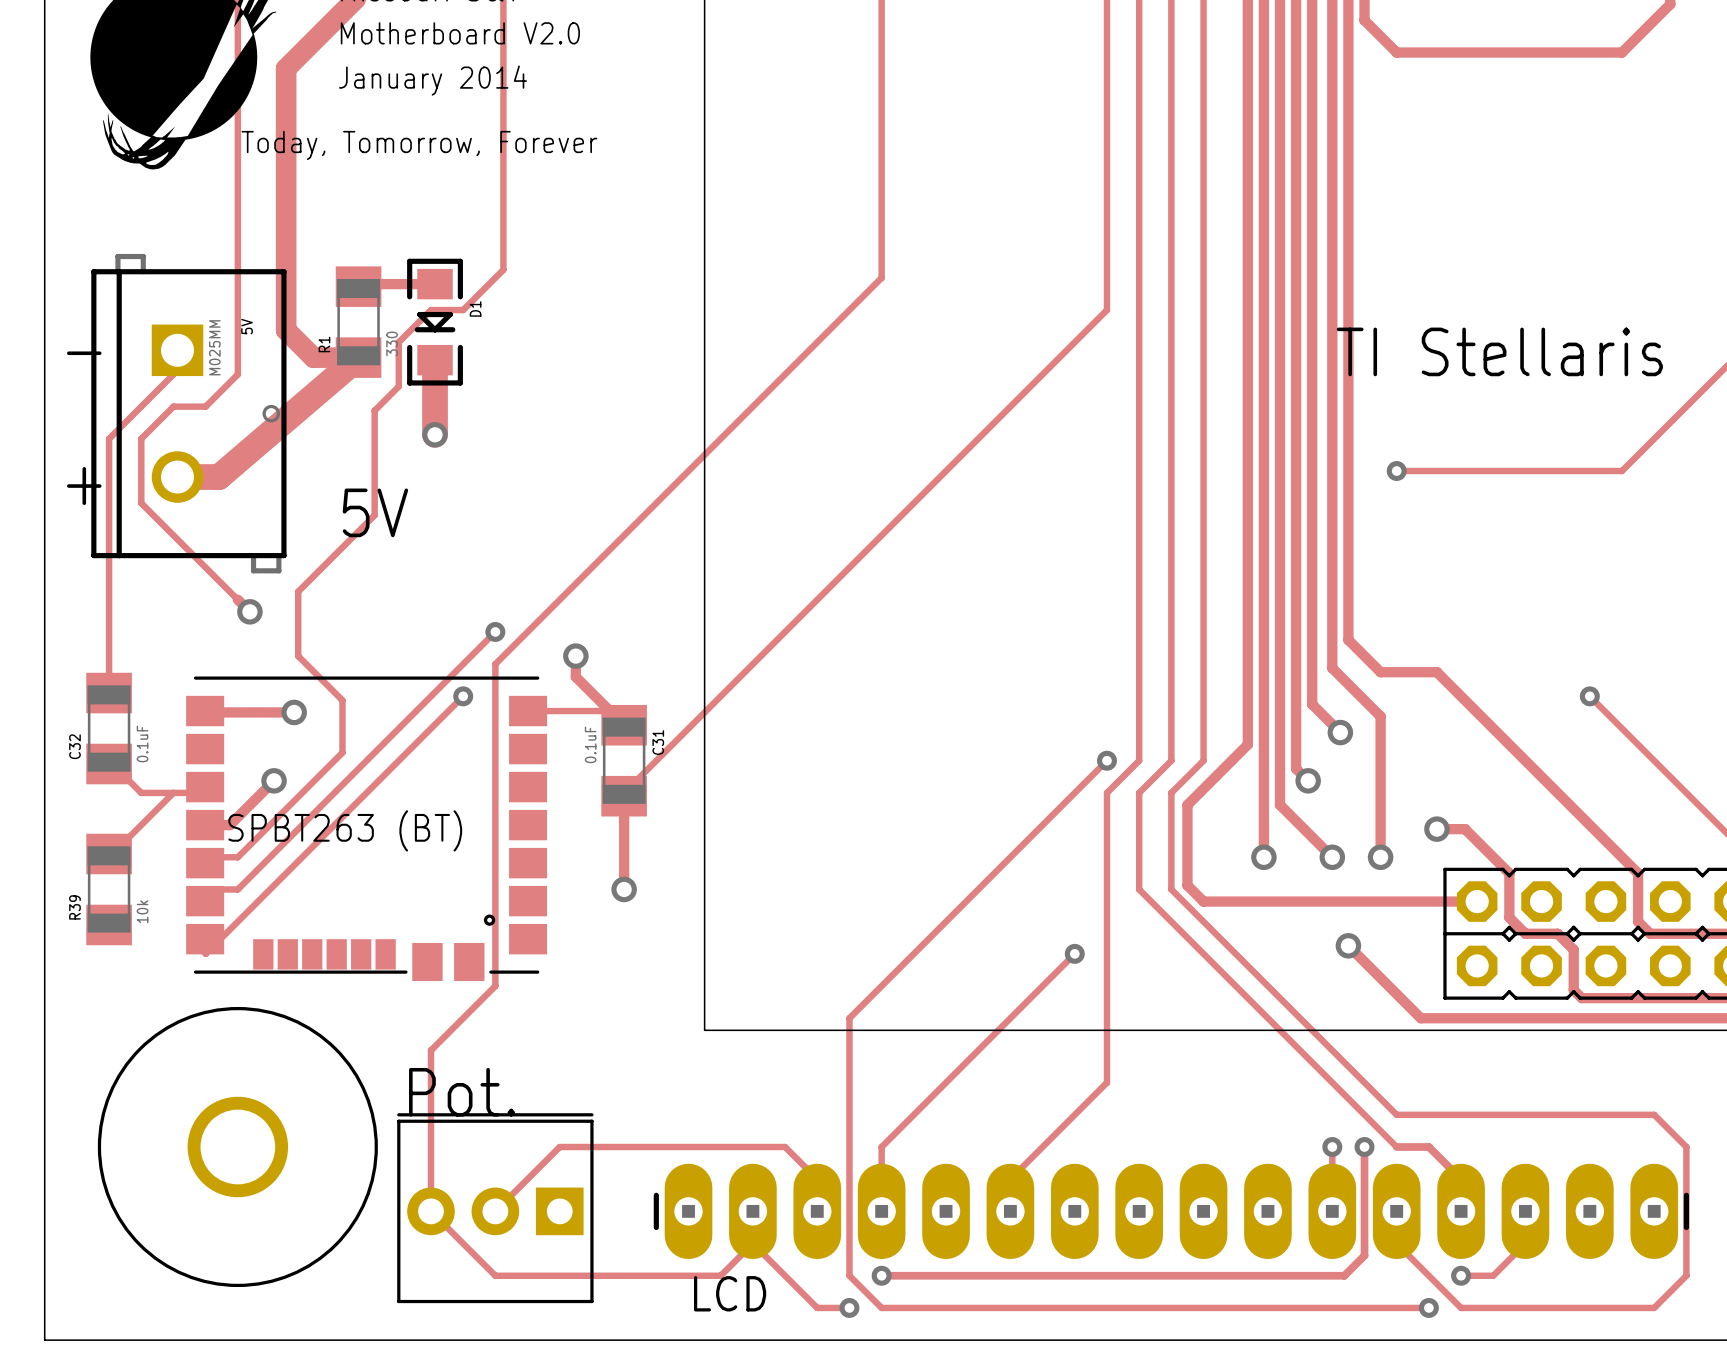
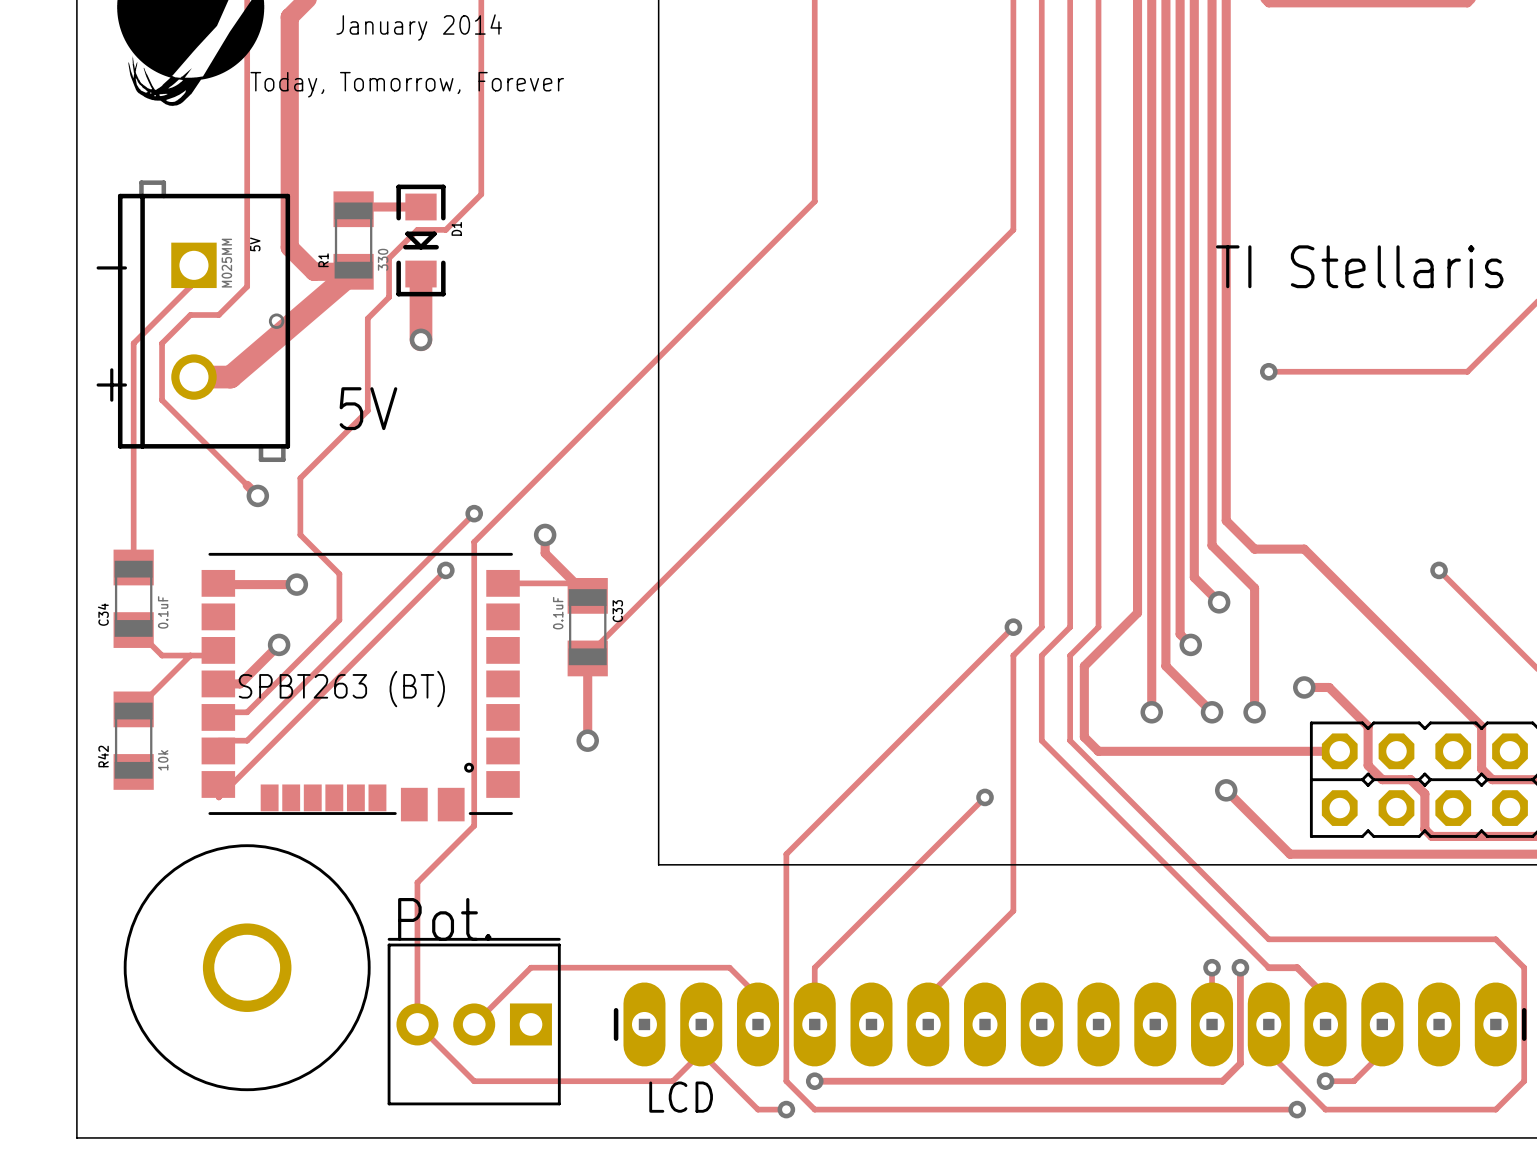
C31 name: C31 (658, 742) -> C33 (617, 611)
C32 name: C32 (74, 746) -> C34 (103, 614)
R39 name: R39 (74, 907) -> R42 (103, 756)

